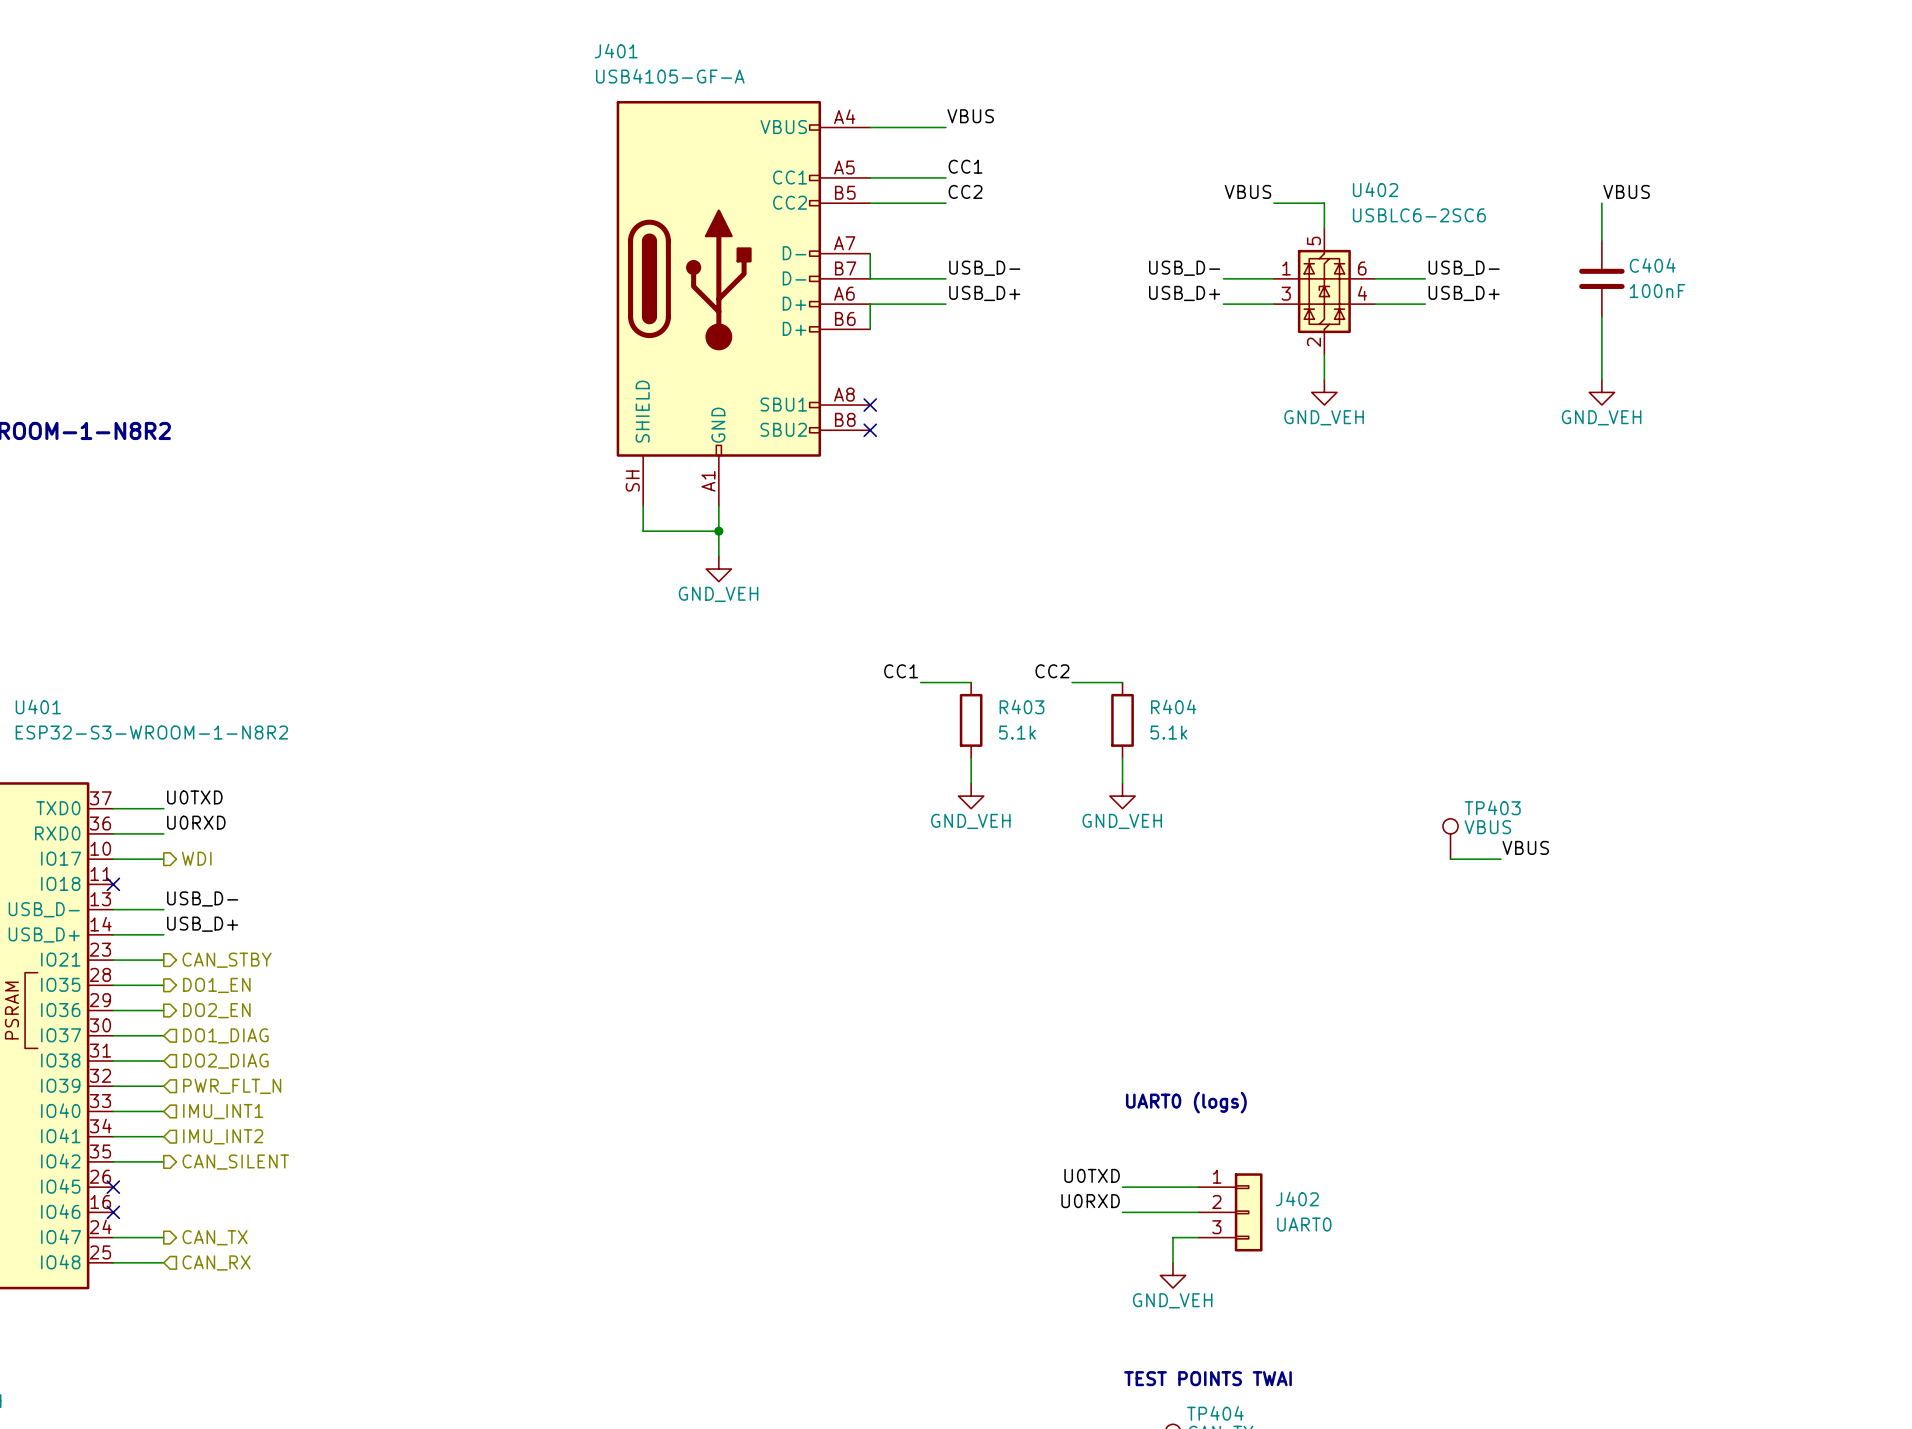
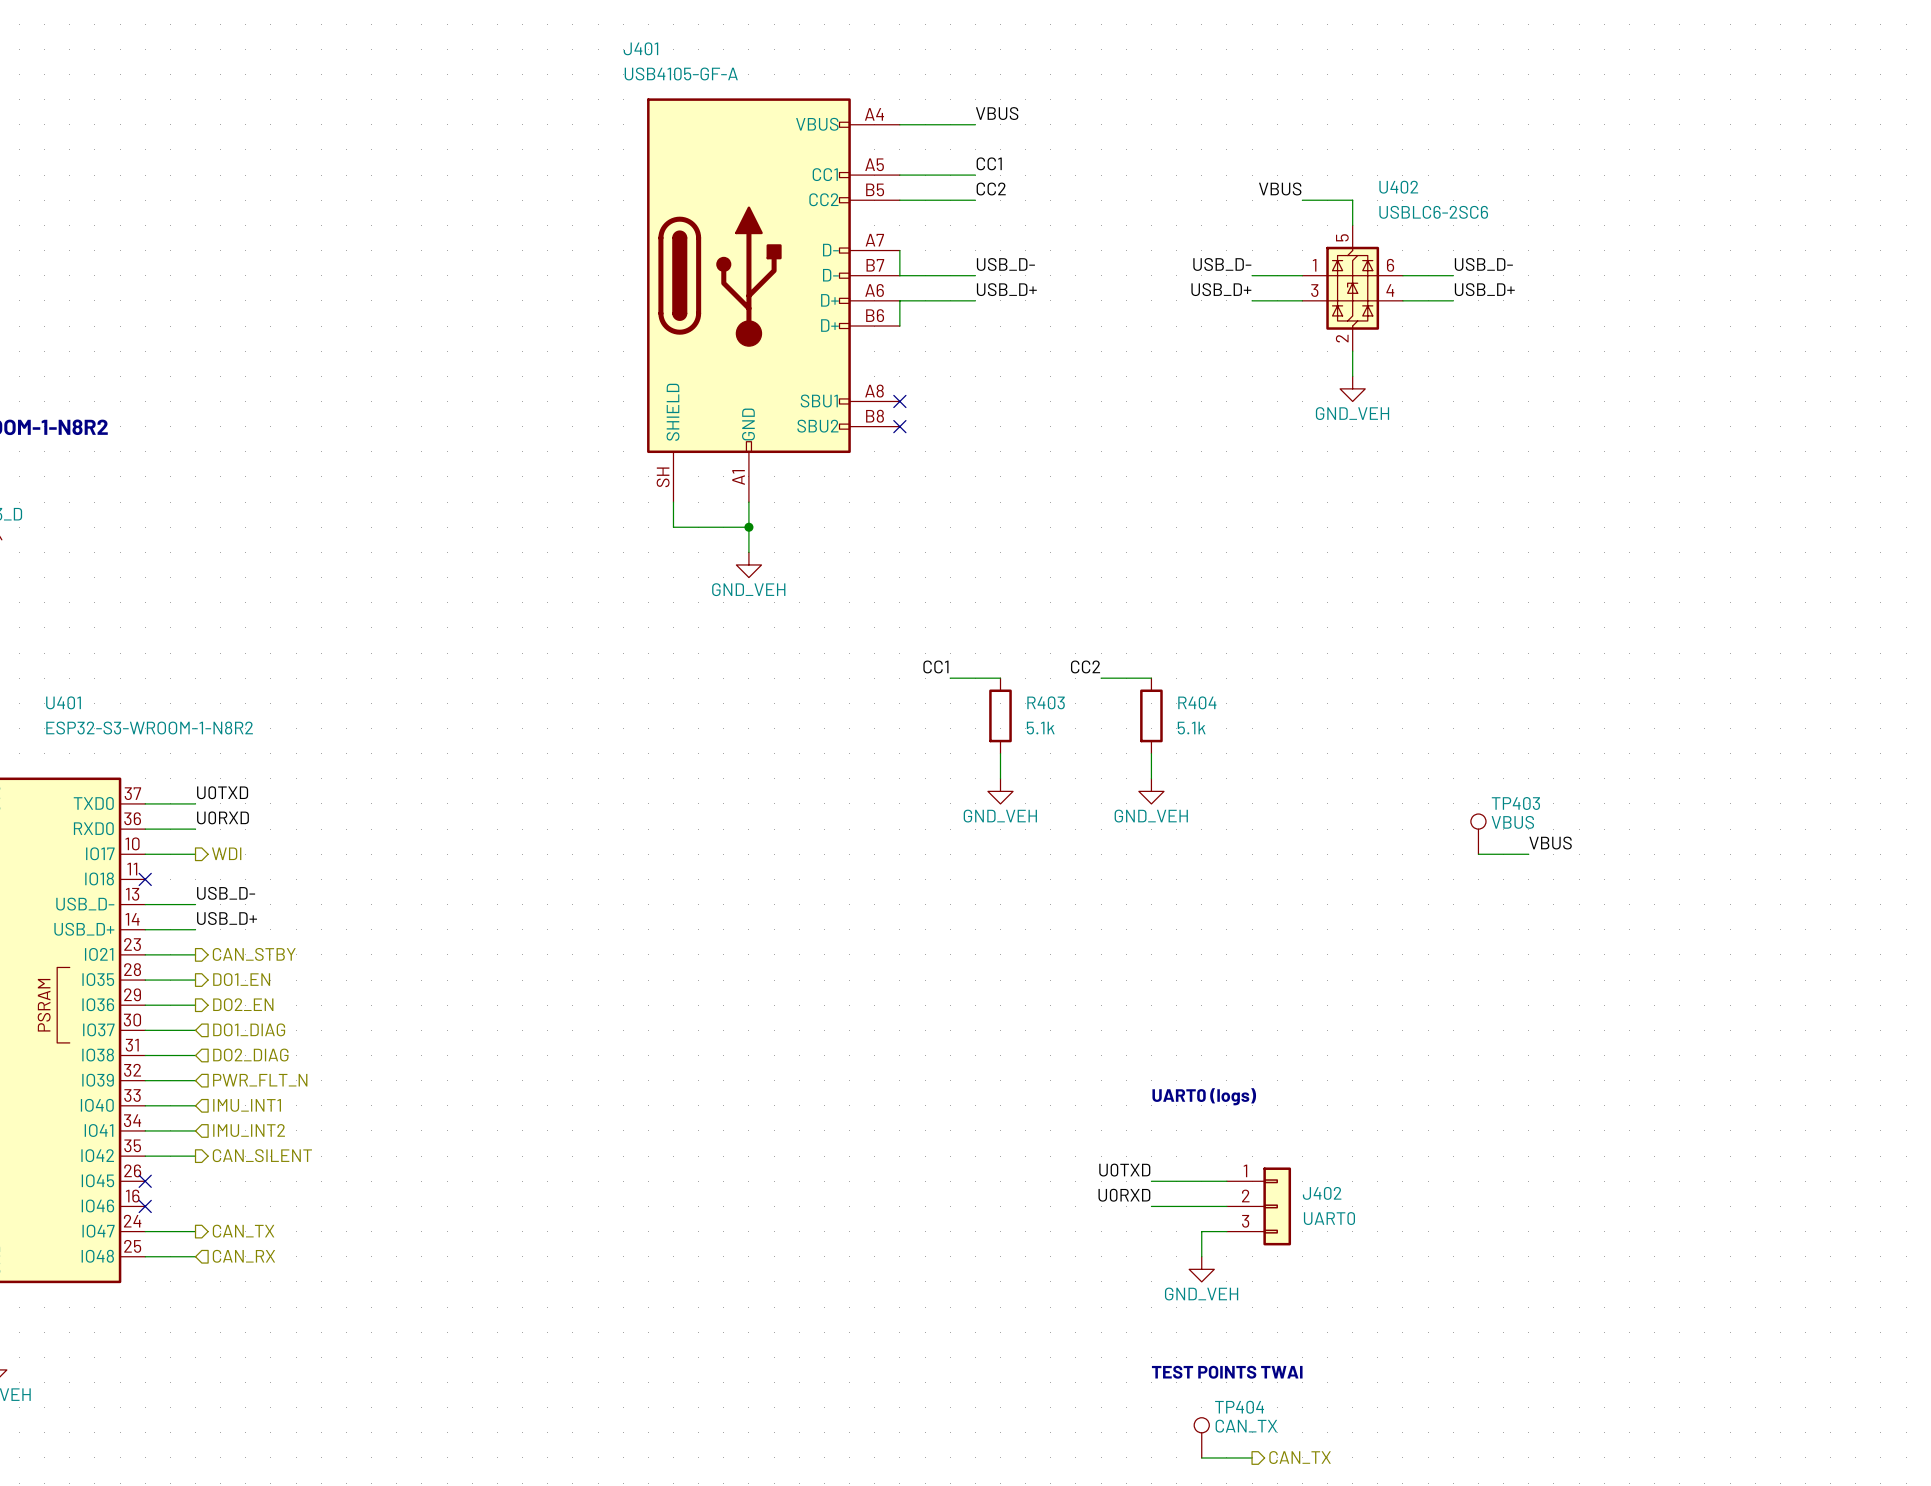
label: VBUS (1626, 191) -> none
wire: (1601, 203) (1601, 241) -> none
C404: 100nF (1601, 278) -> none
wire: (1601, 316) (1601, 379) -> none
power symbol: GND_VEH (1601, 392) -> none

